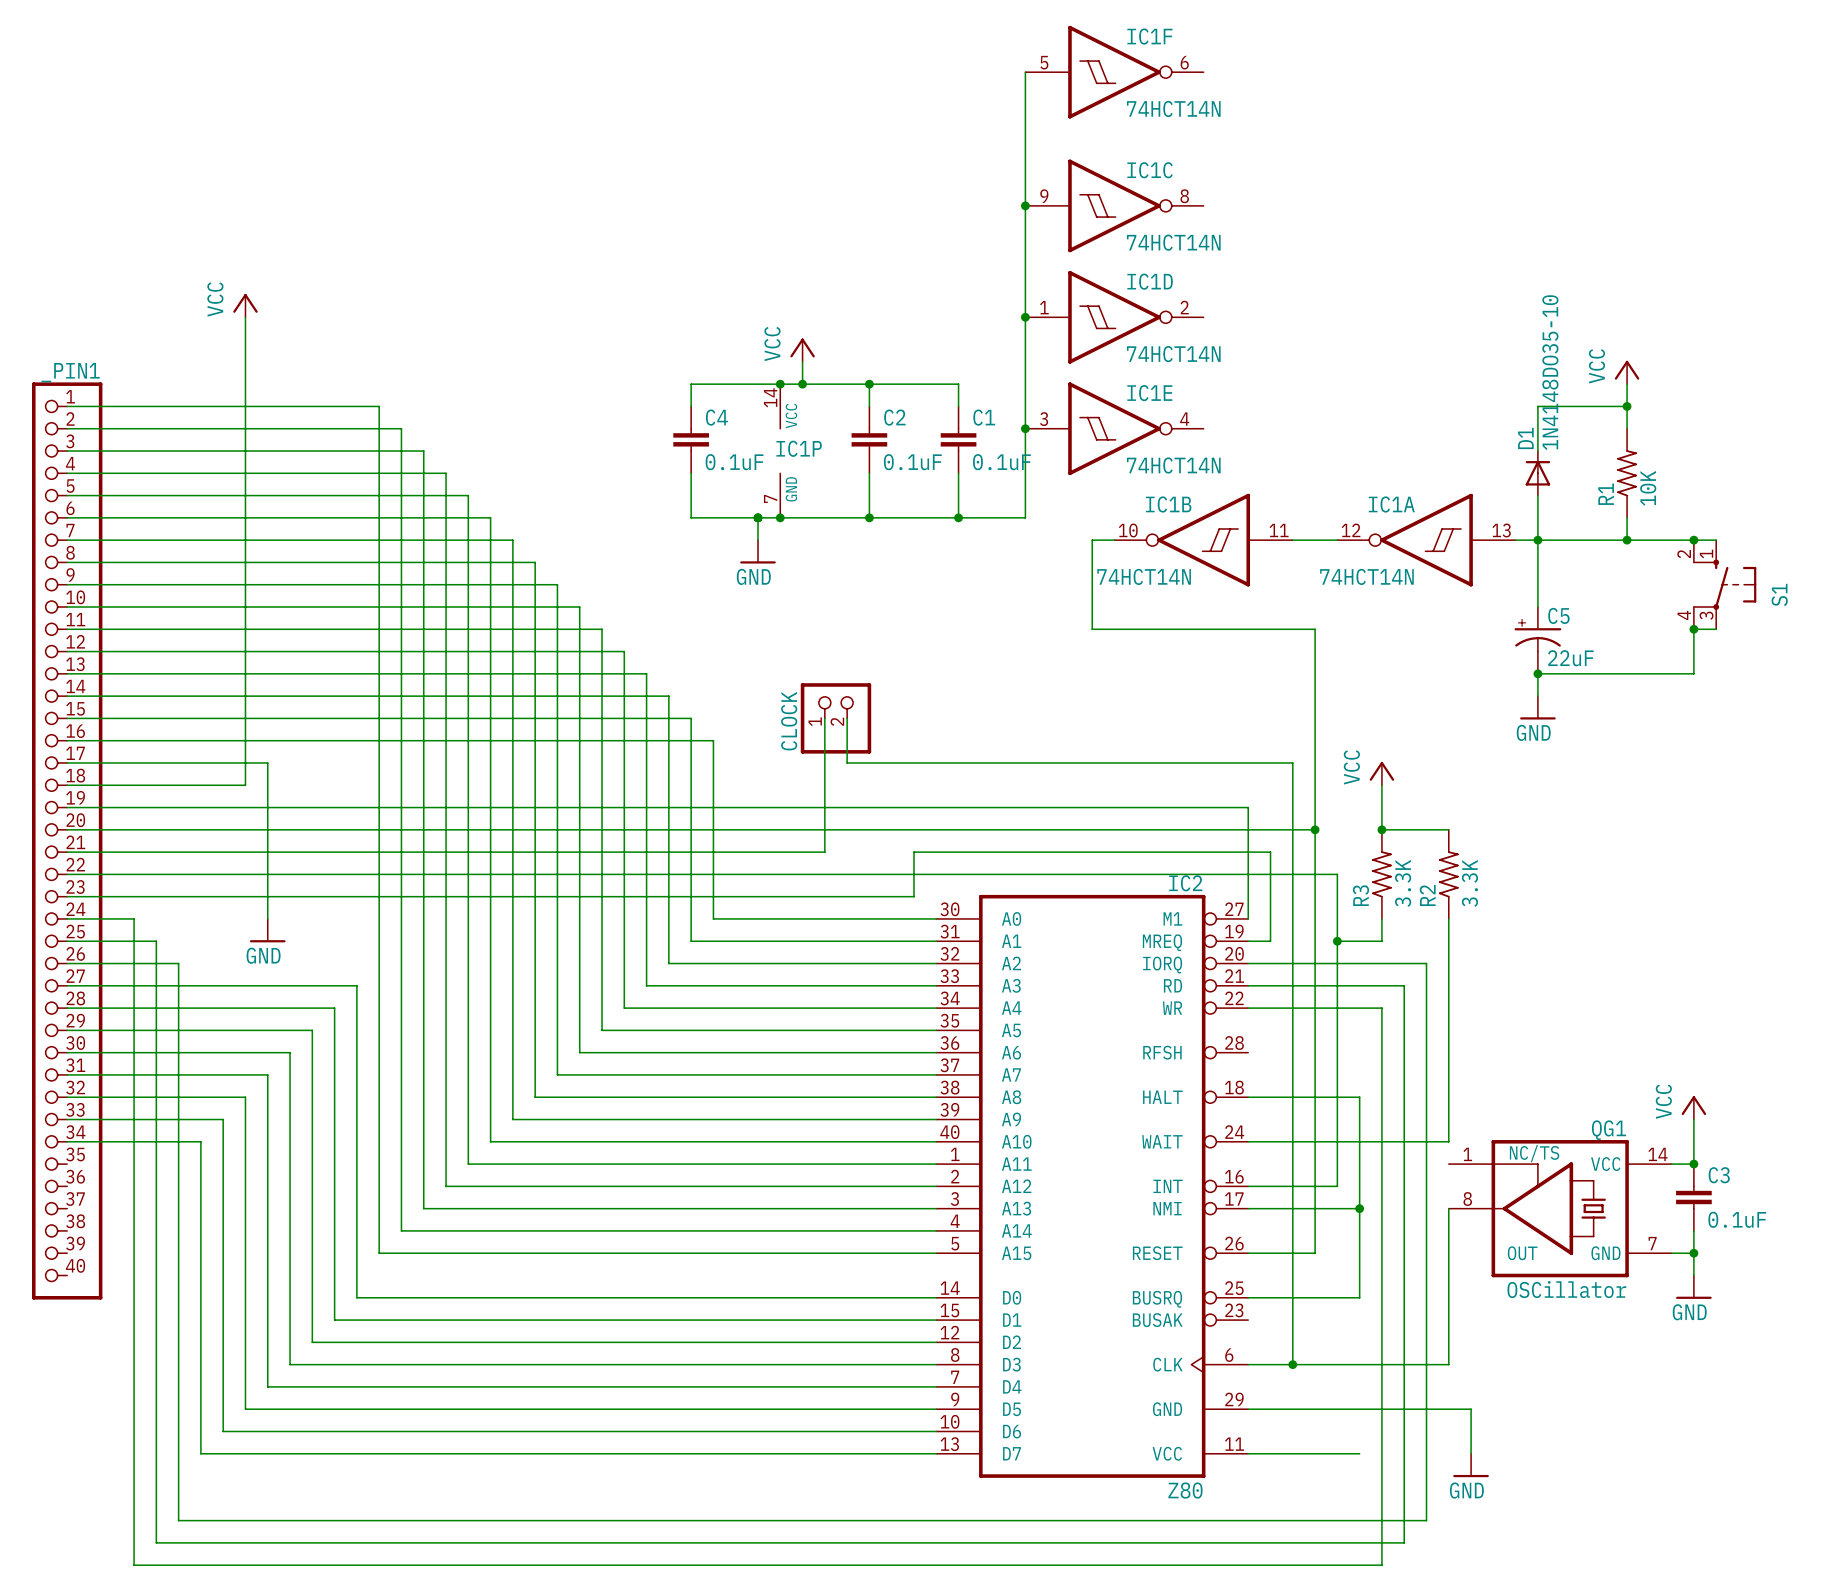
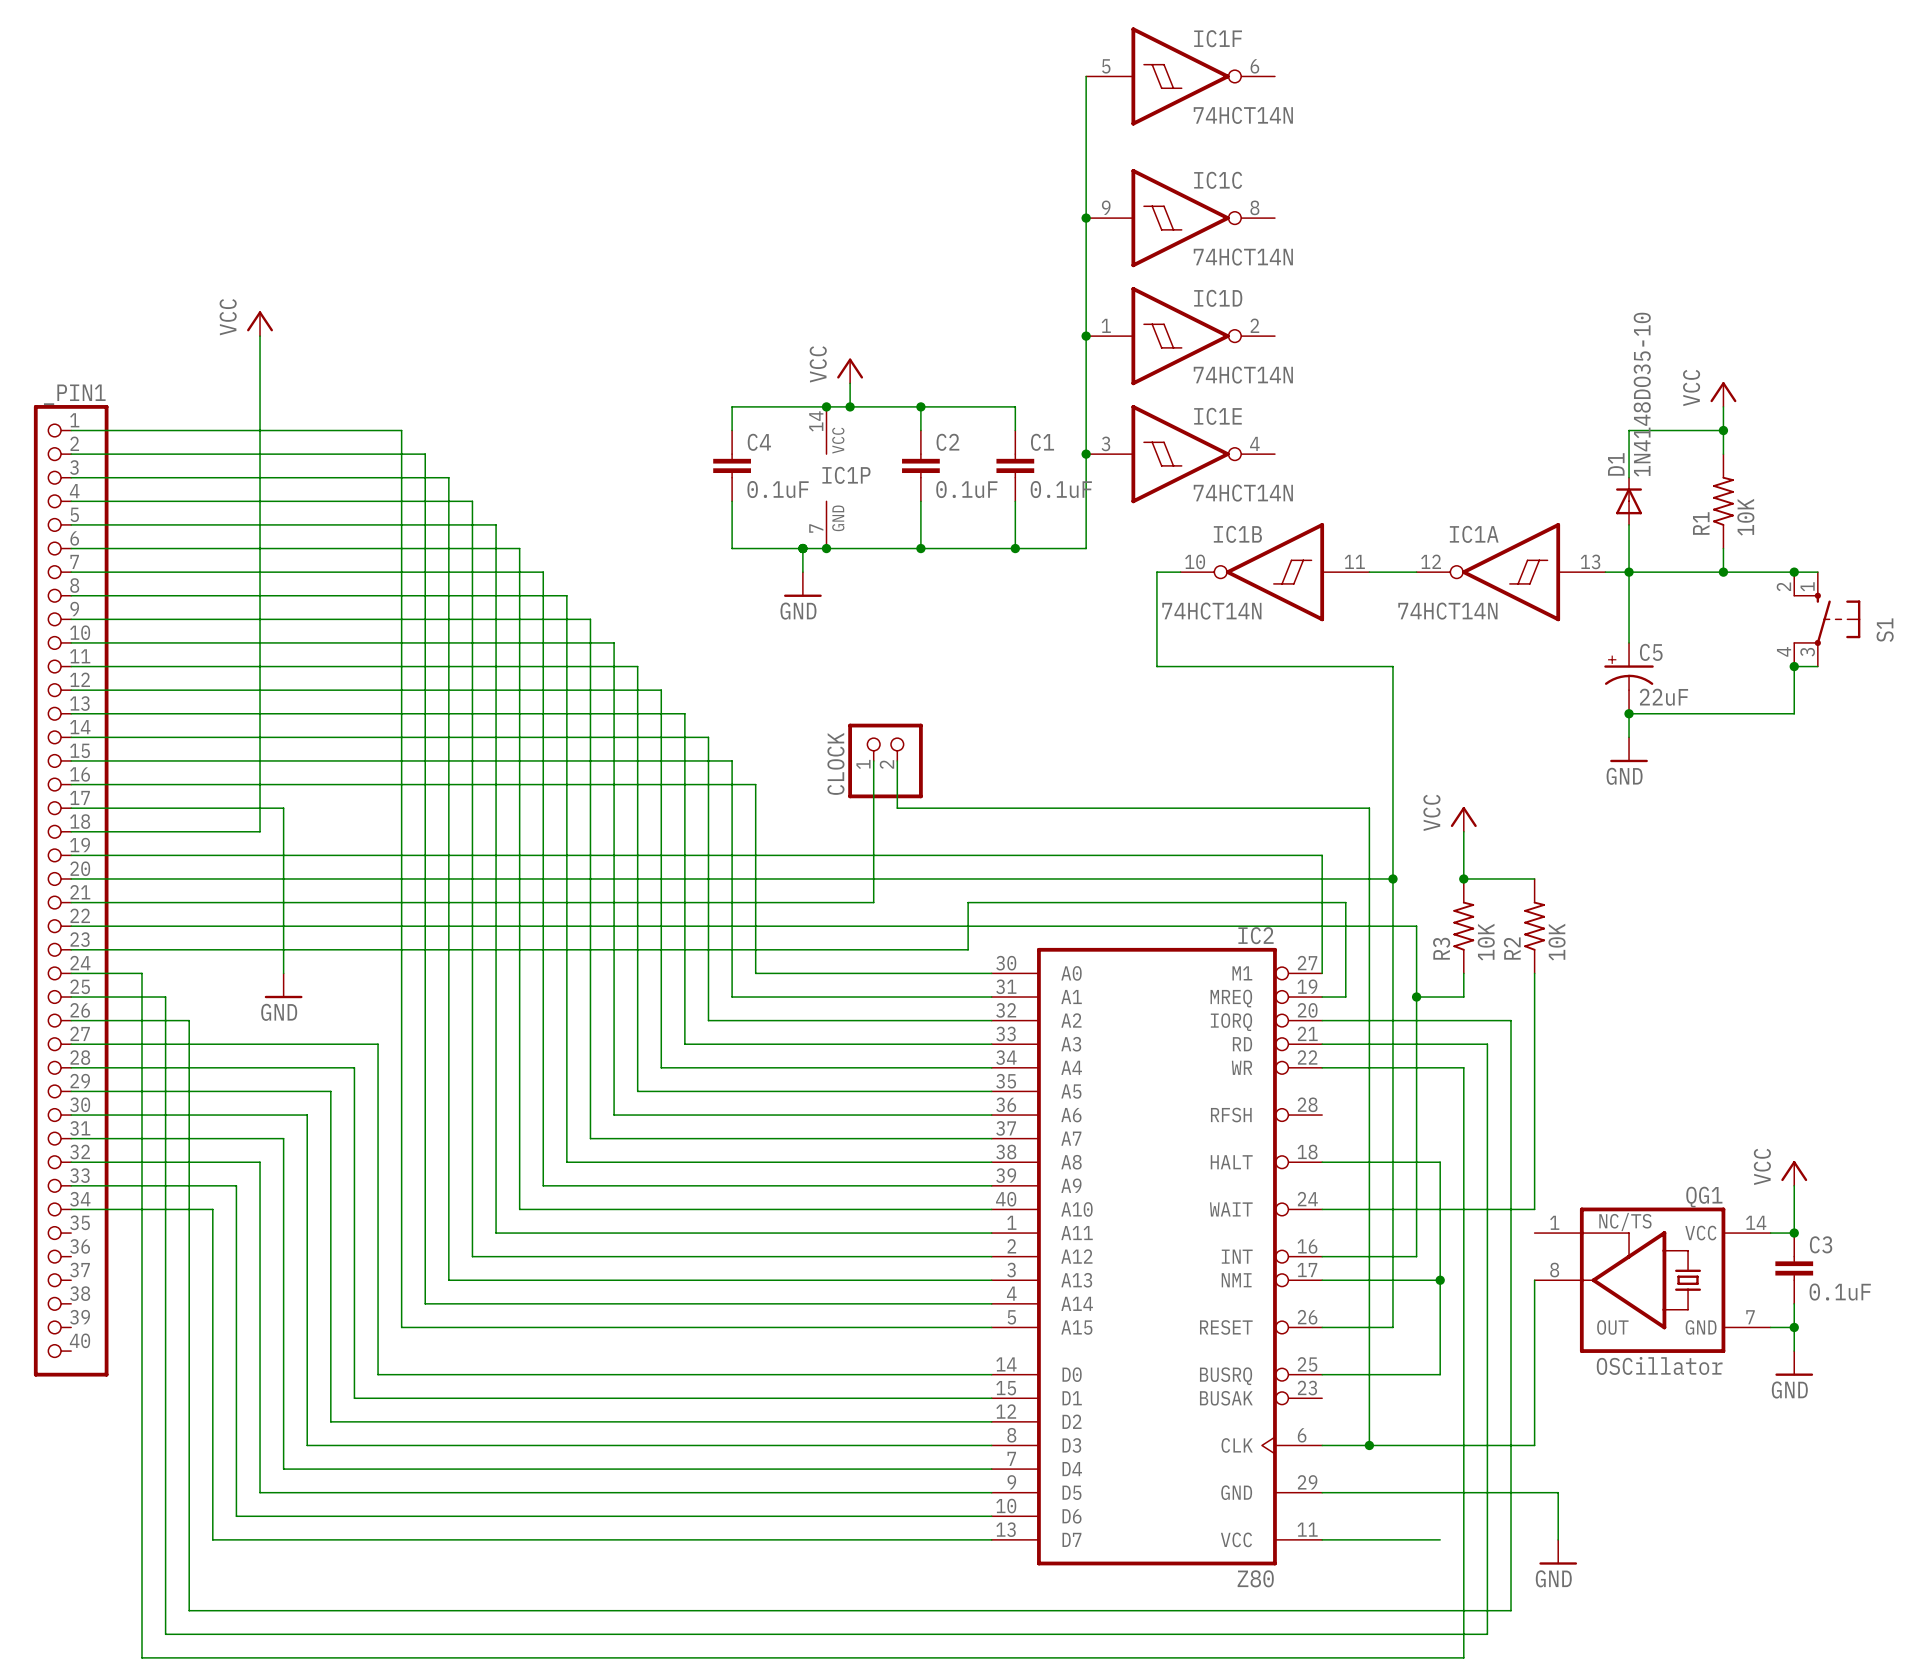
R3 value: 3.3K (1403, 883) -> 10K (1486, 942)
R2 value: 3.3K (1469, 883) -> 10K (1557, 942)

